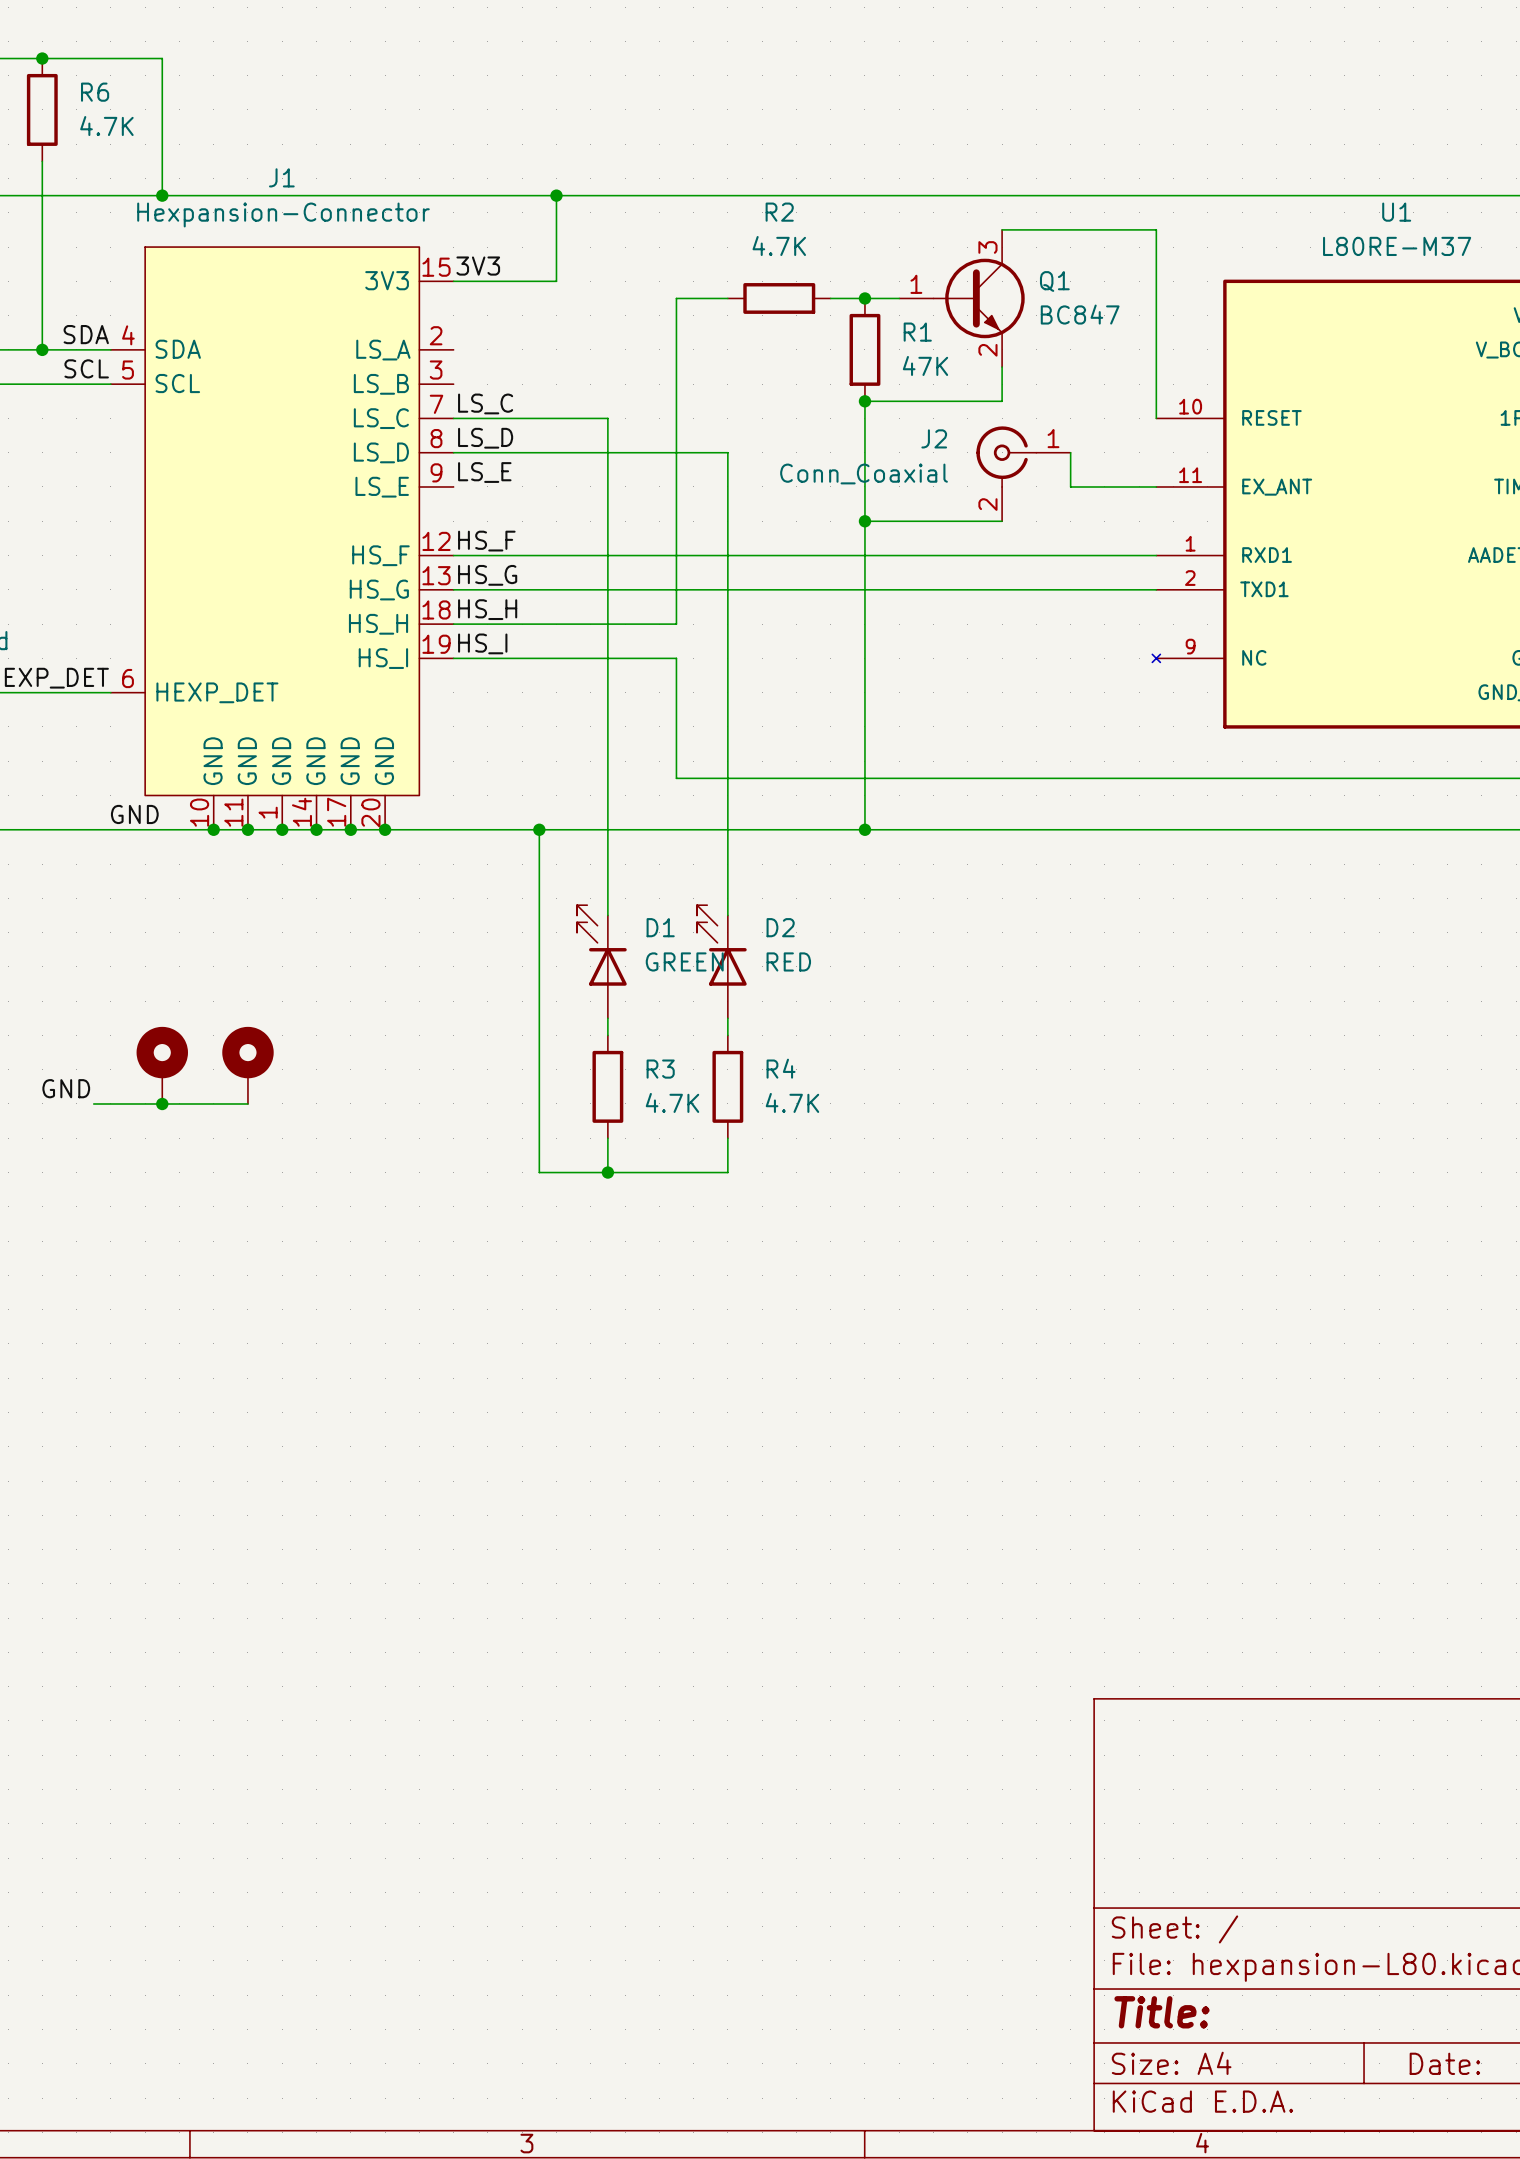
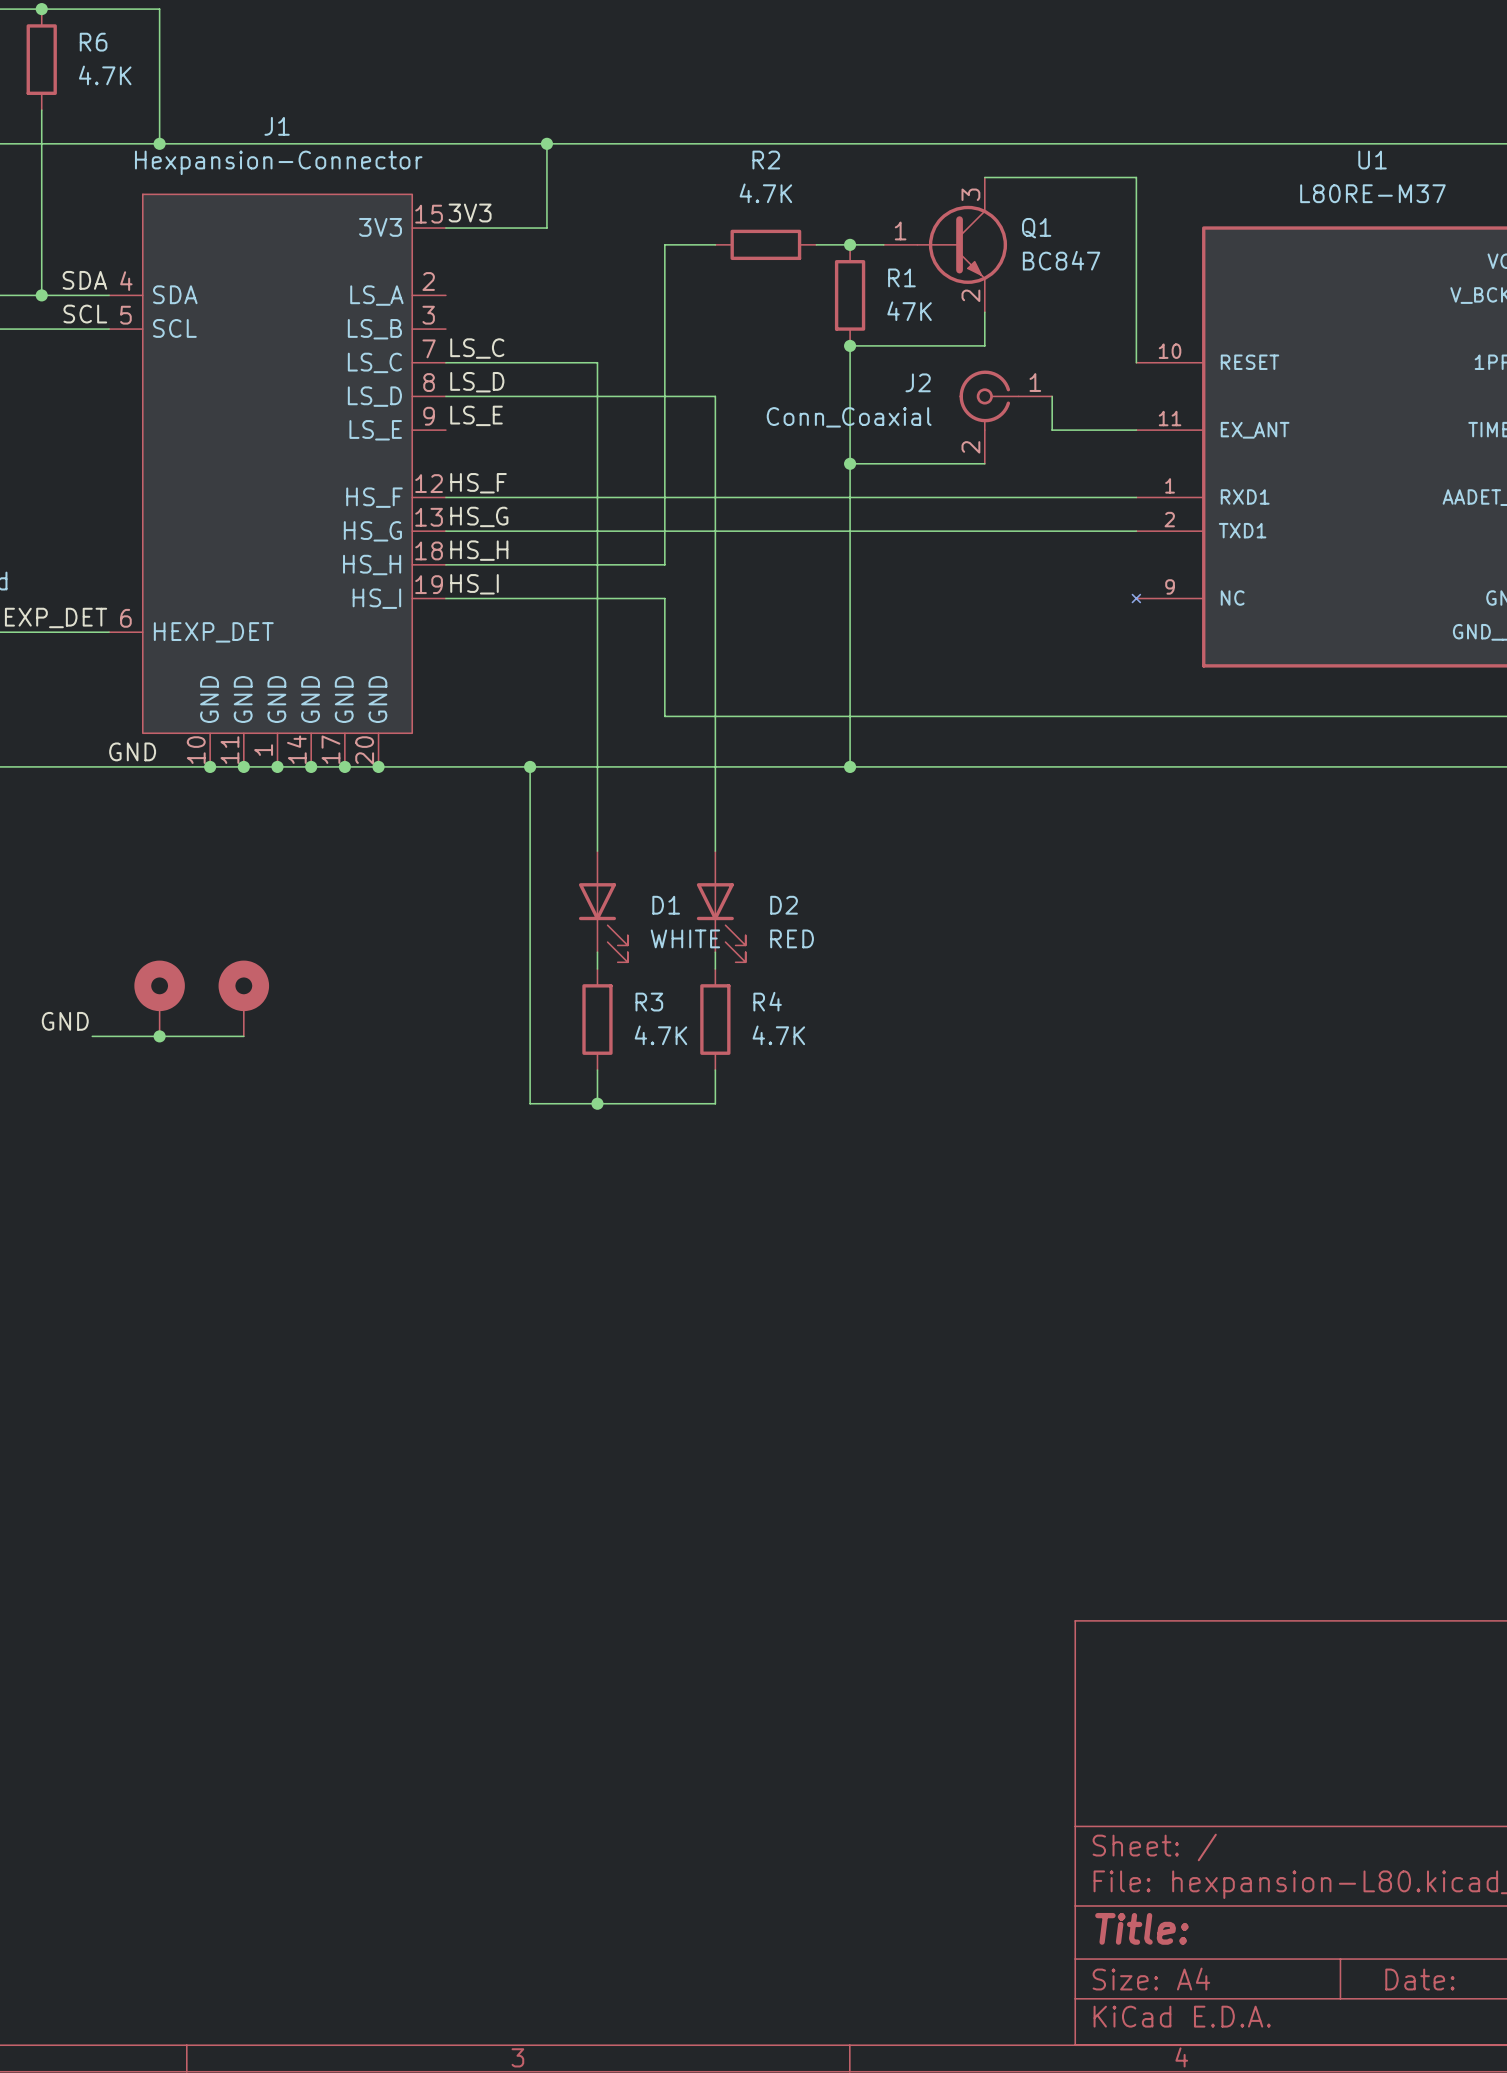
D1 name position: D1 (660, 927) -> D1 (666, 905)
D2 name position: D2 (780, 927) -> D2 (784, 905)
D1 rotation: 0° (601, 945) -> 180° (603, 922)
D2 rotation: 0° (721, 945) -> 180° (721, 922)
D1 value: GREEN (684, 961) -> WHITE (685, 938)
D2 value position: RED (788, 961) -> RED (792, 938)

